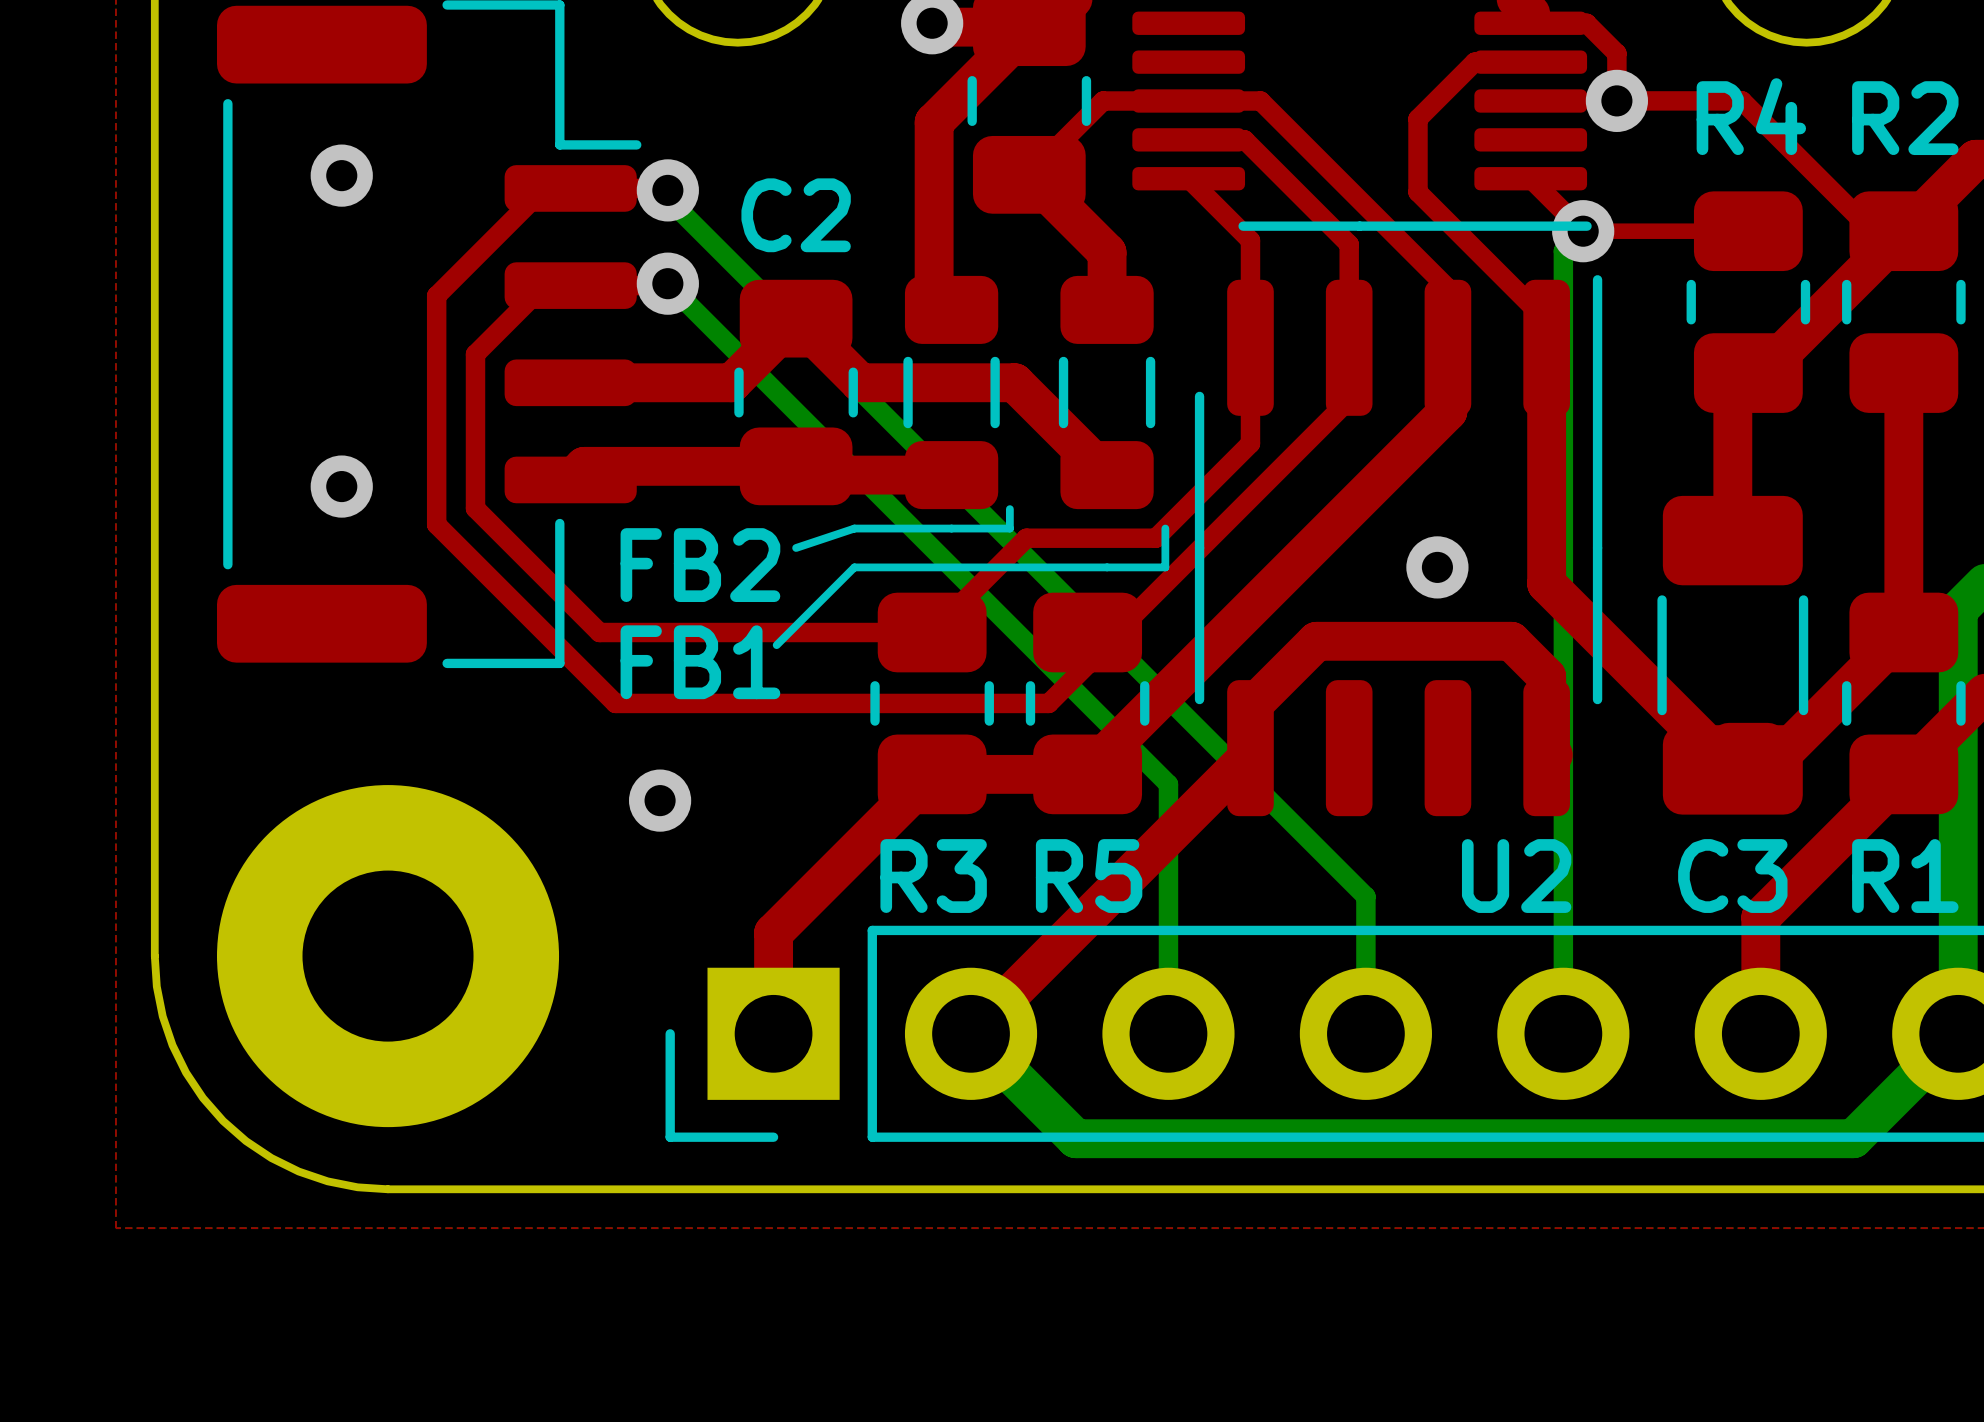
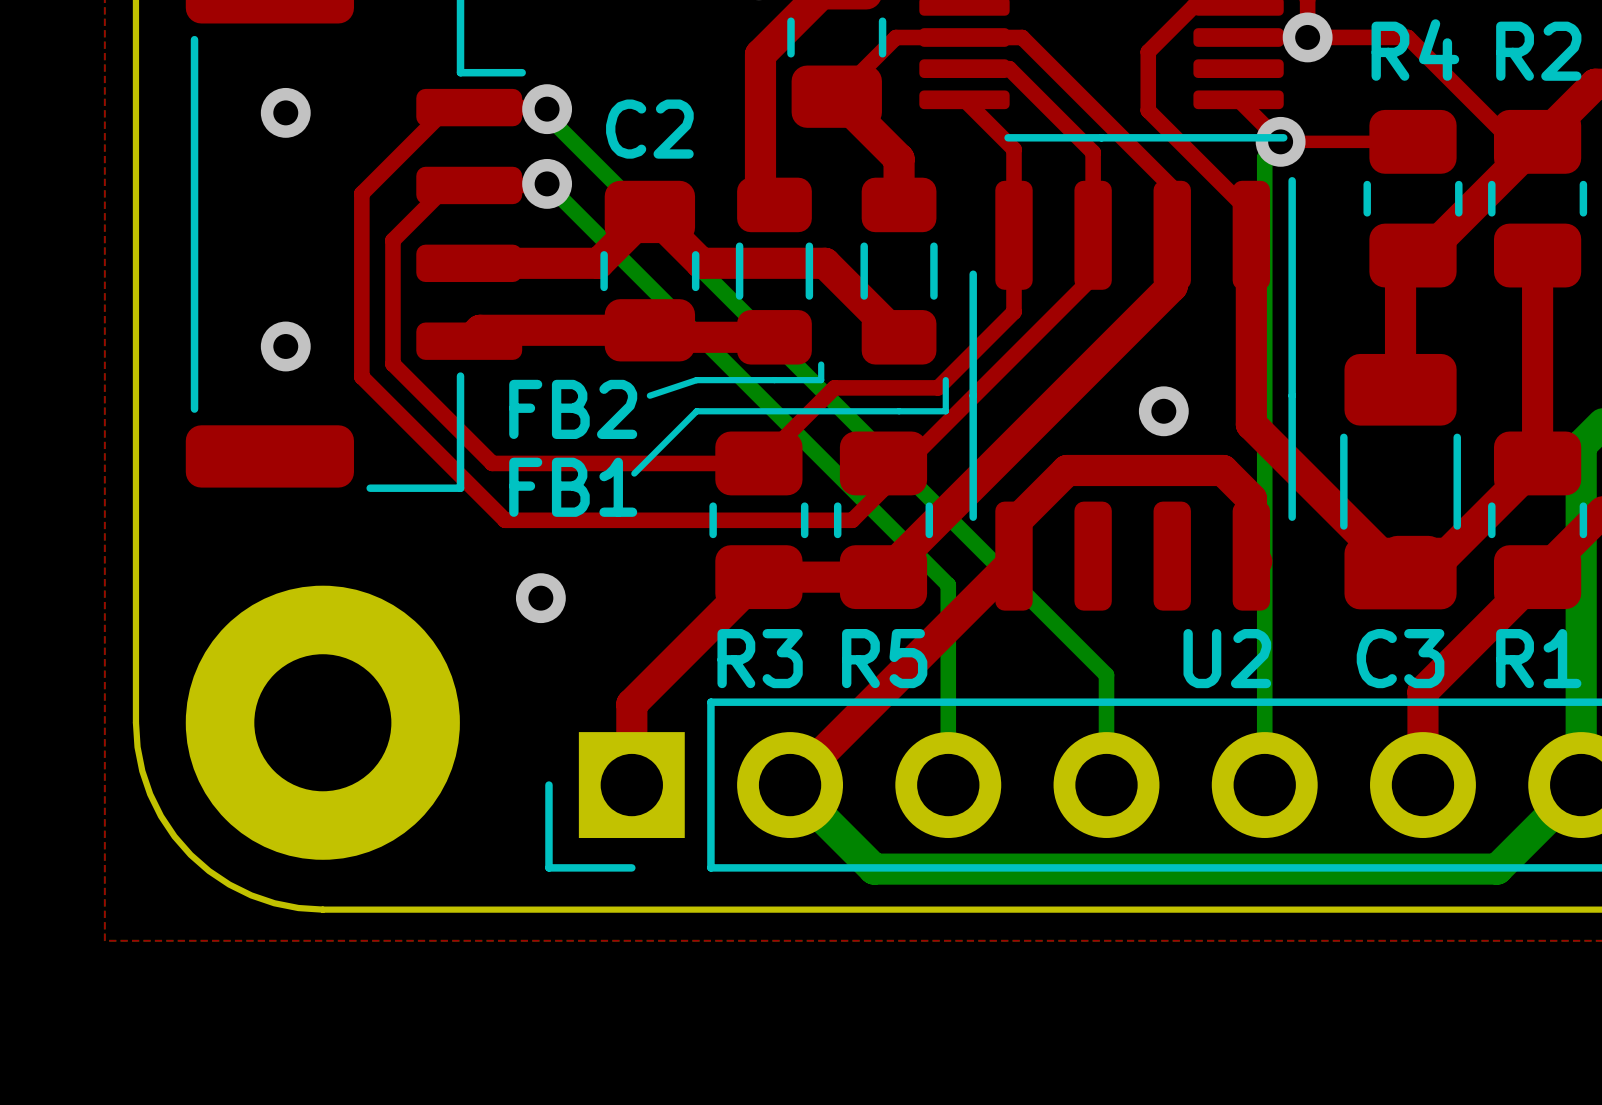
via position: (341, 175) -> (285, 112)

